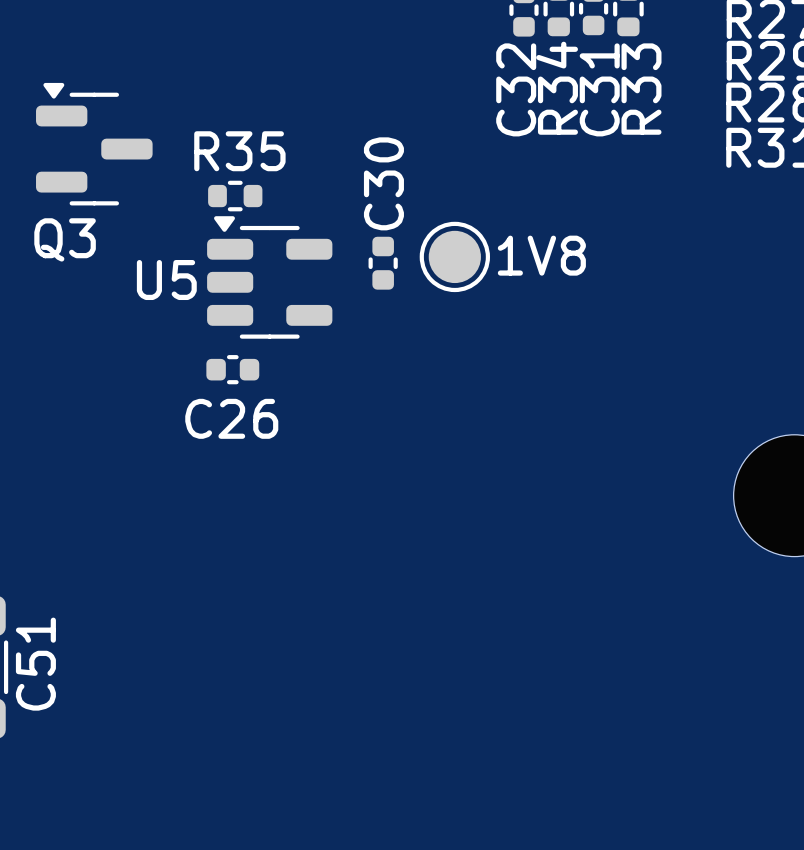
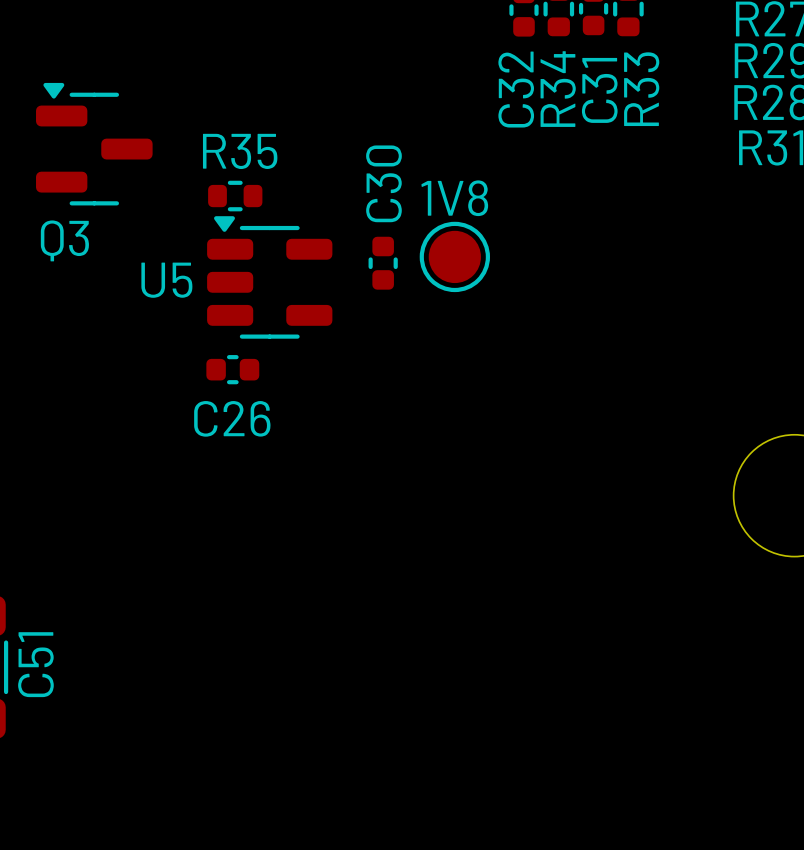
1V8 name position: 1V8 (541, 255) -> 1V8 (454, 198)

